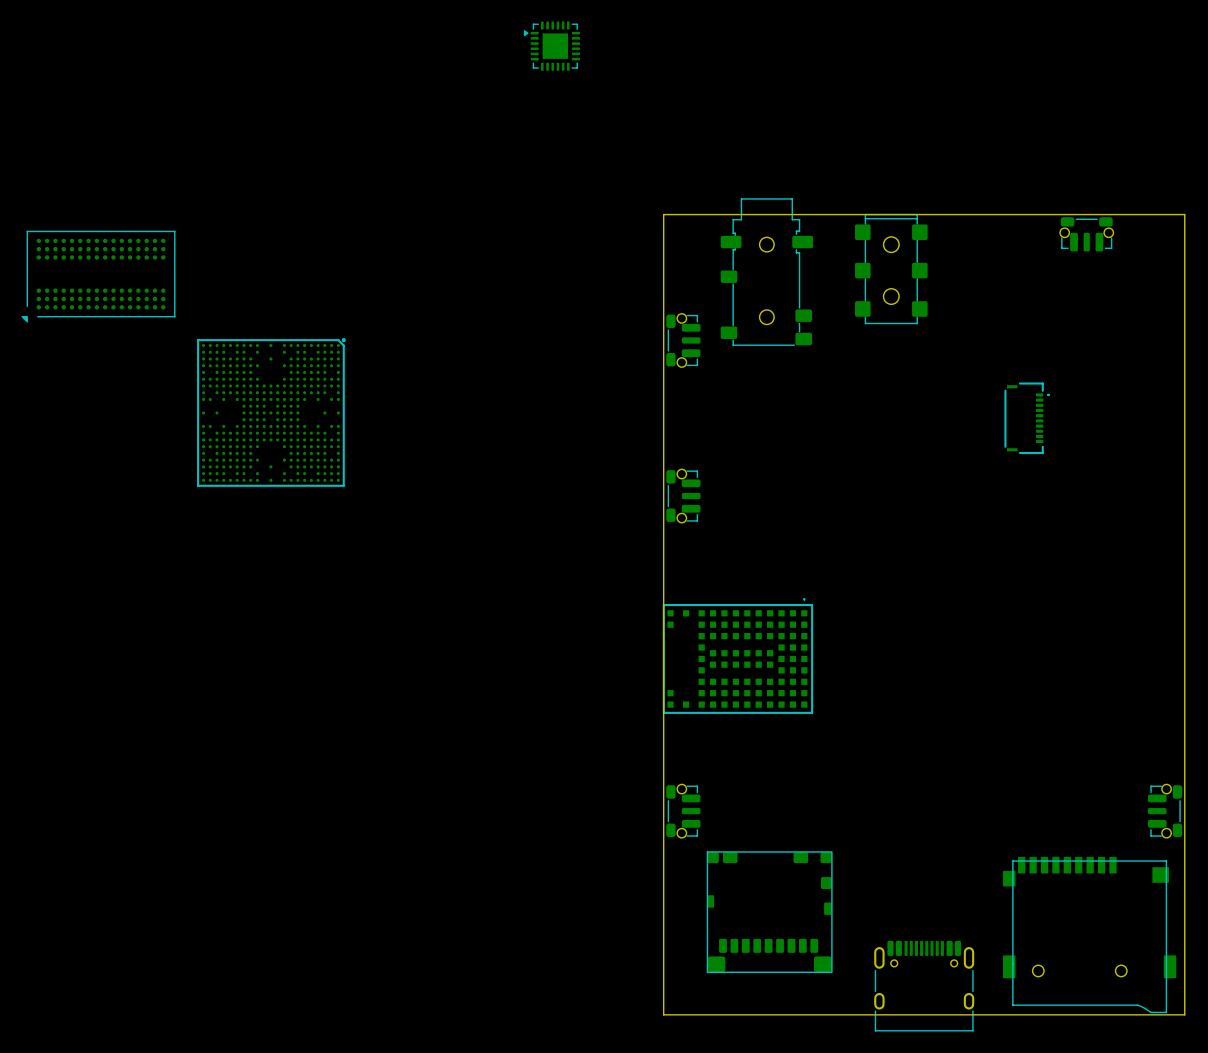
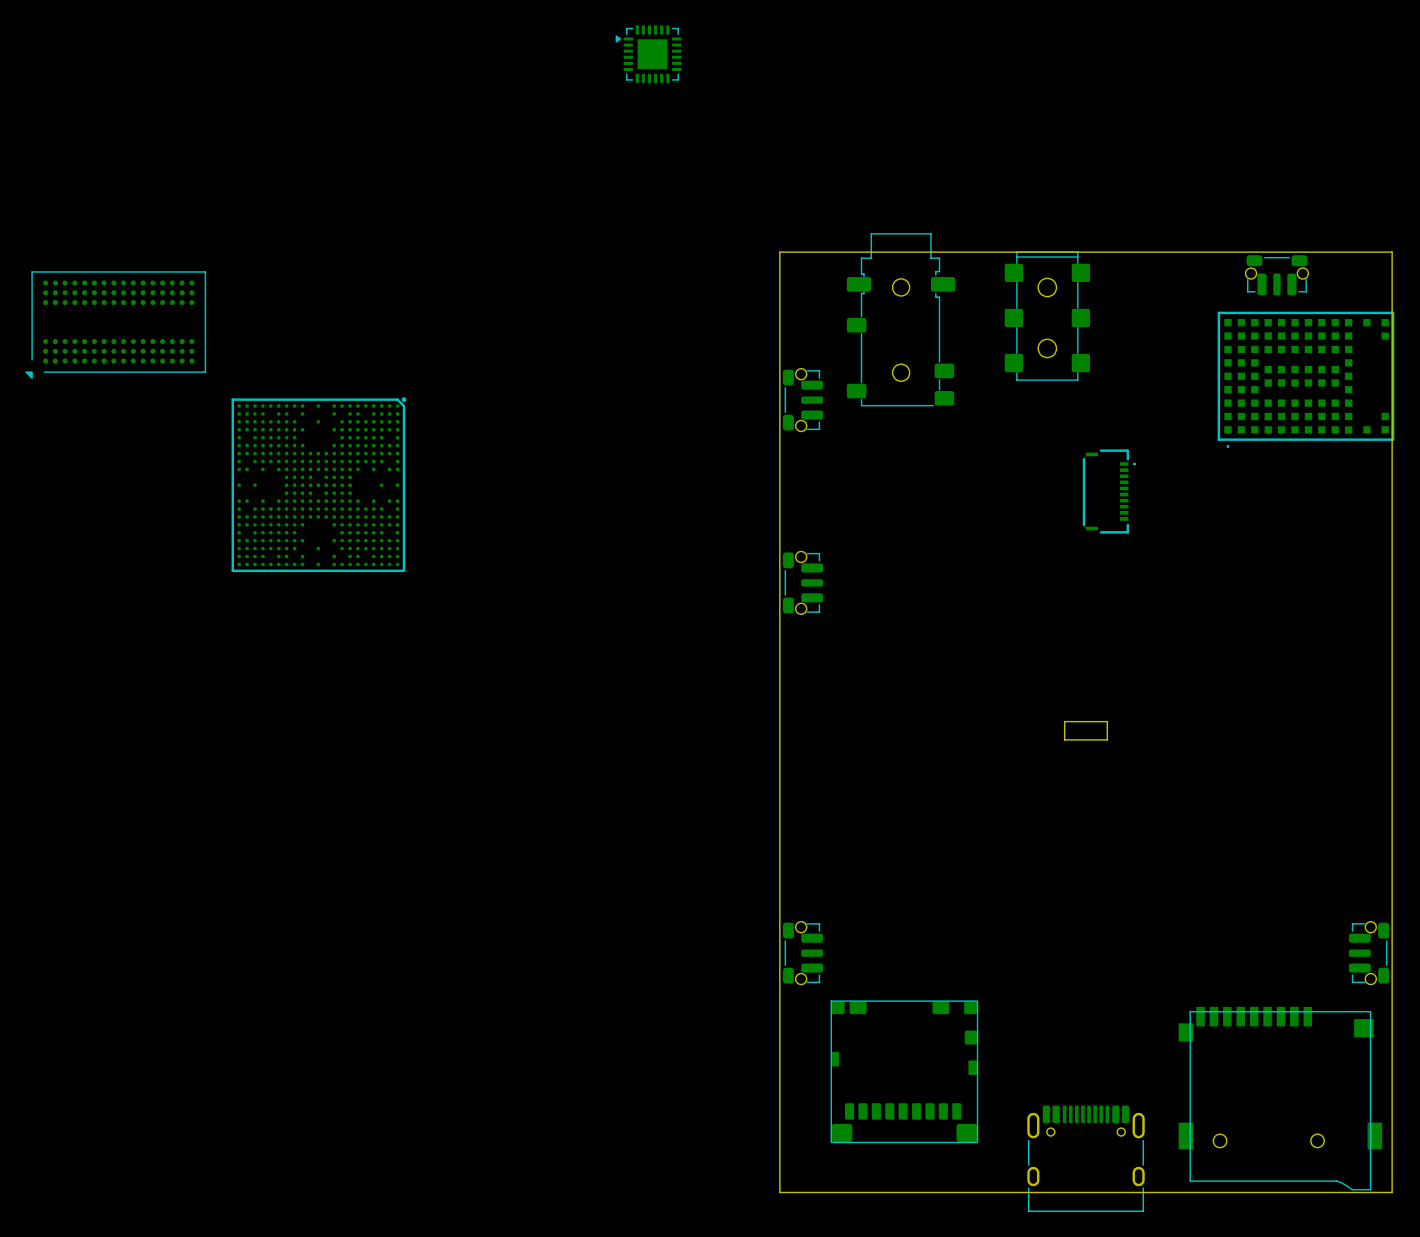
part: none -> (1306, 379)
part position: (1026, 418) -> (1109, 491)
board edge: none -> (1107, 721) (1064, 721) (1064, 739) (1107, 739) (1107, 721)
part: (737, 656) -> none

